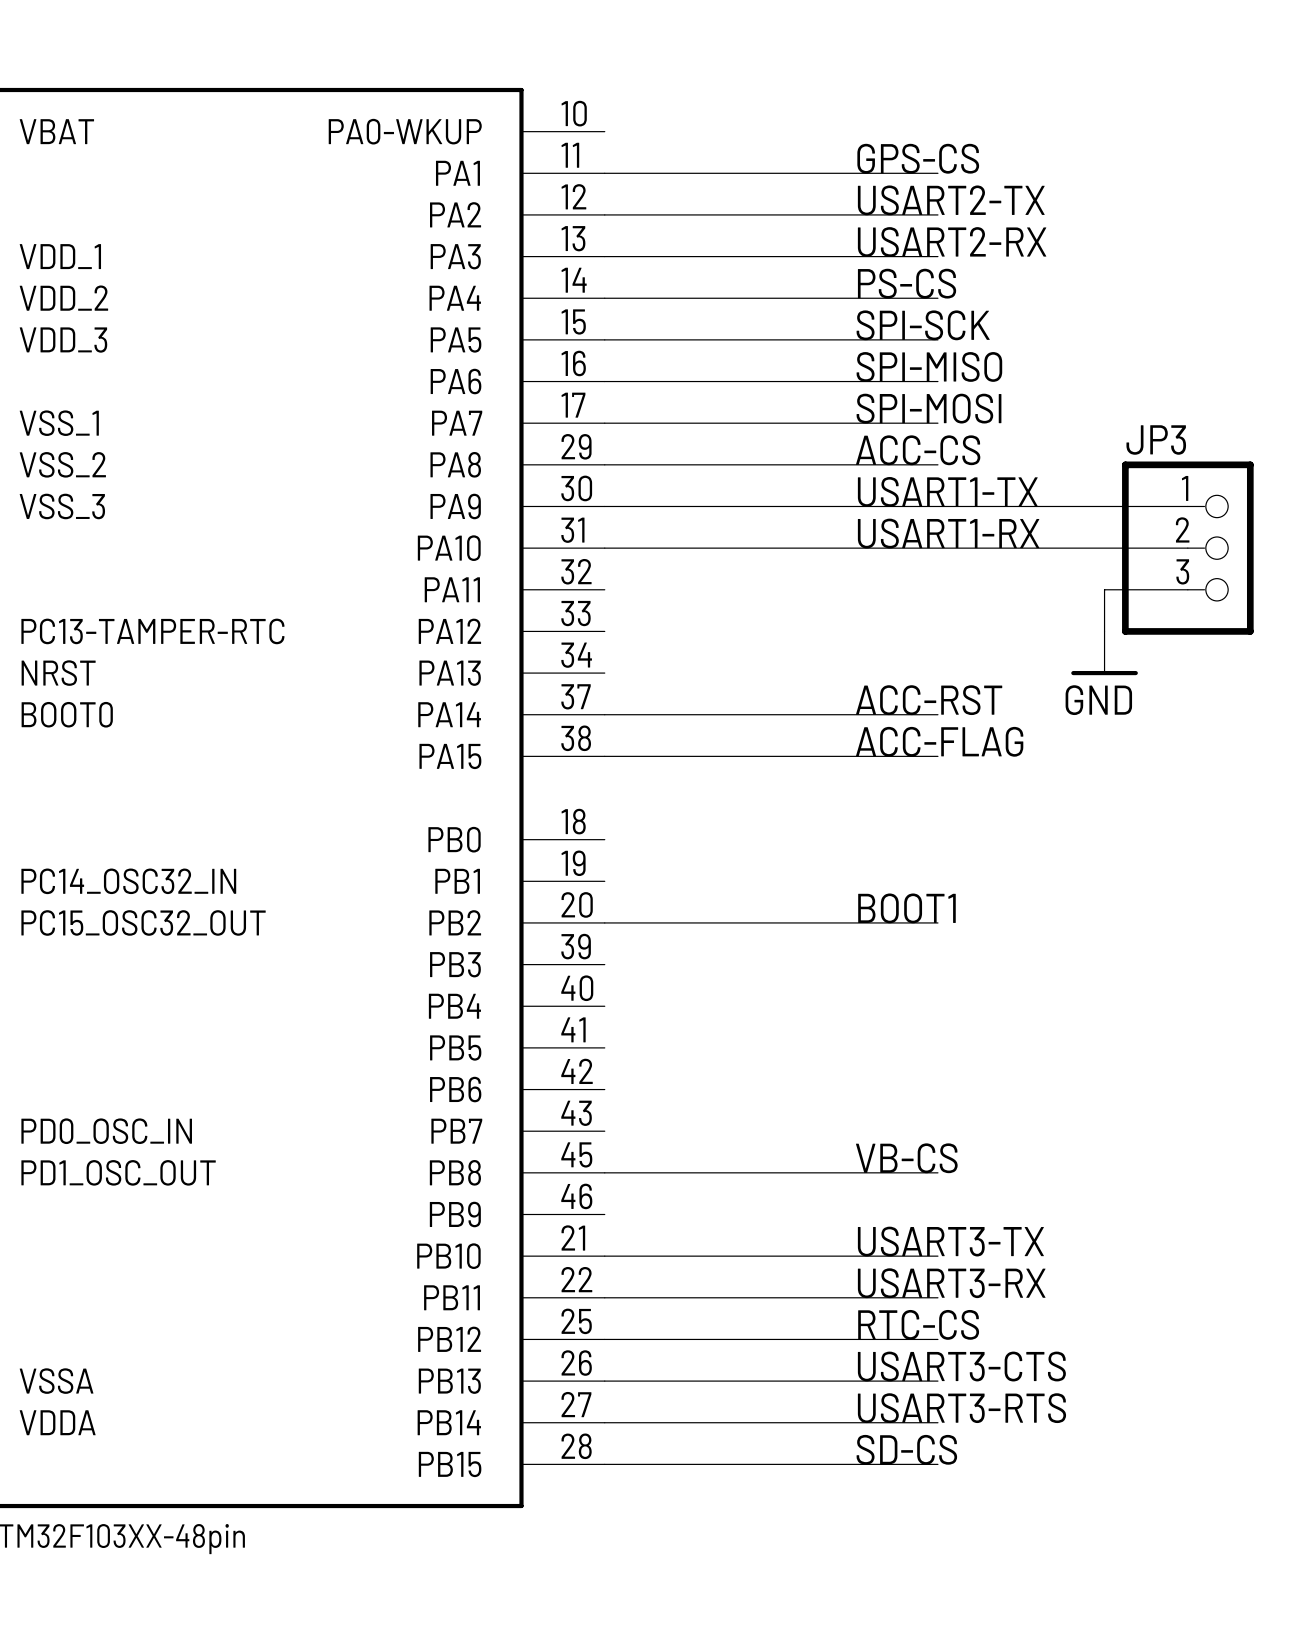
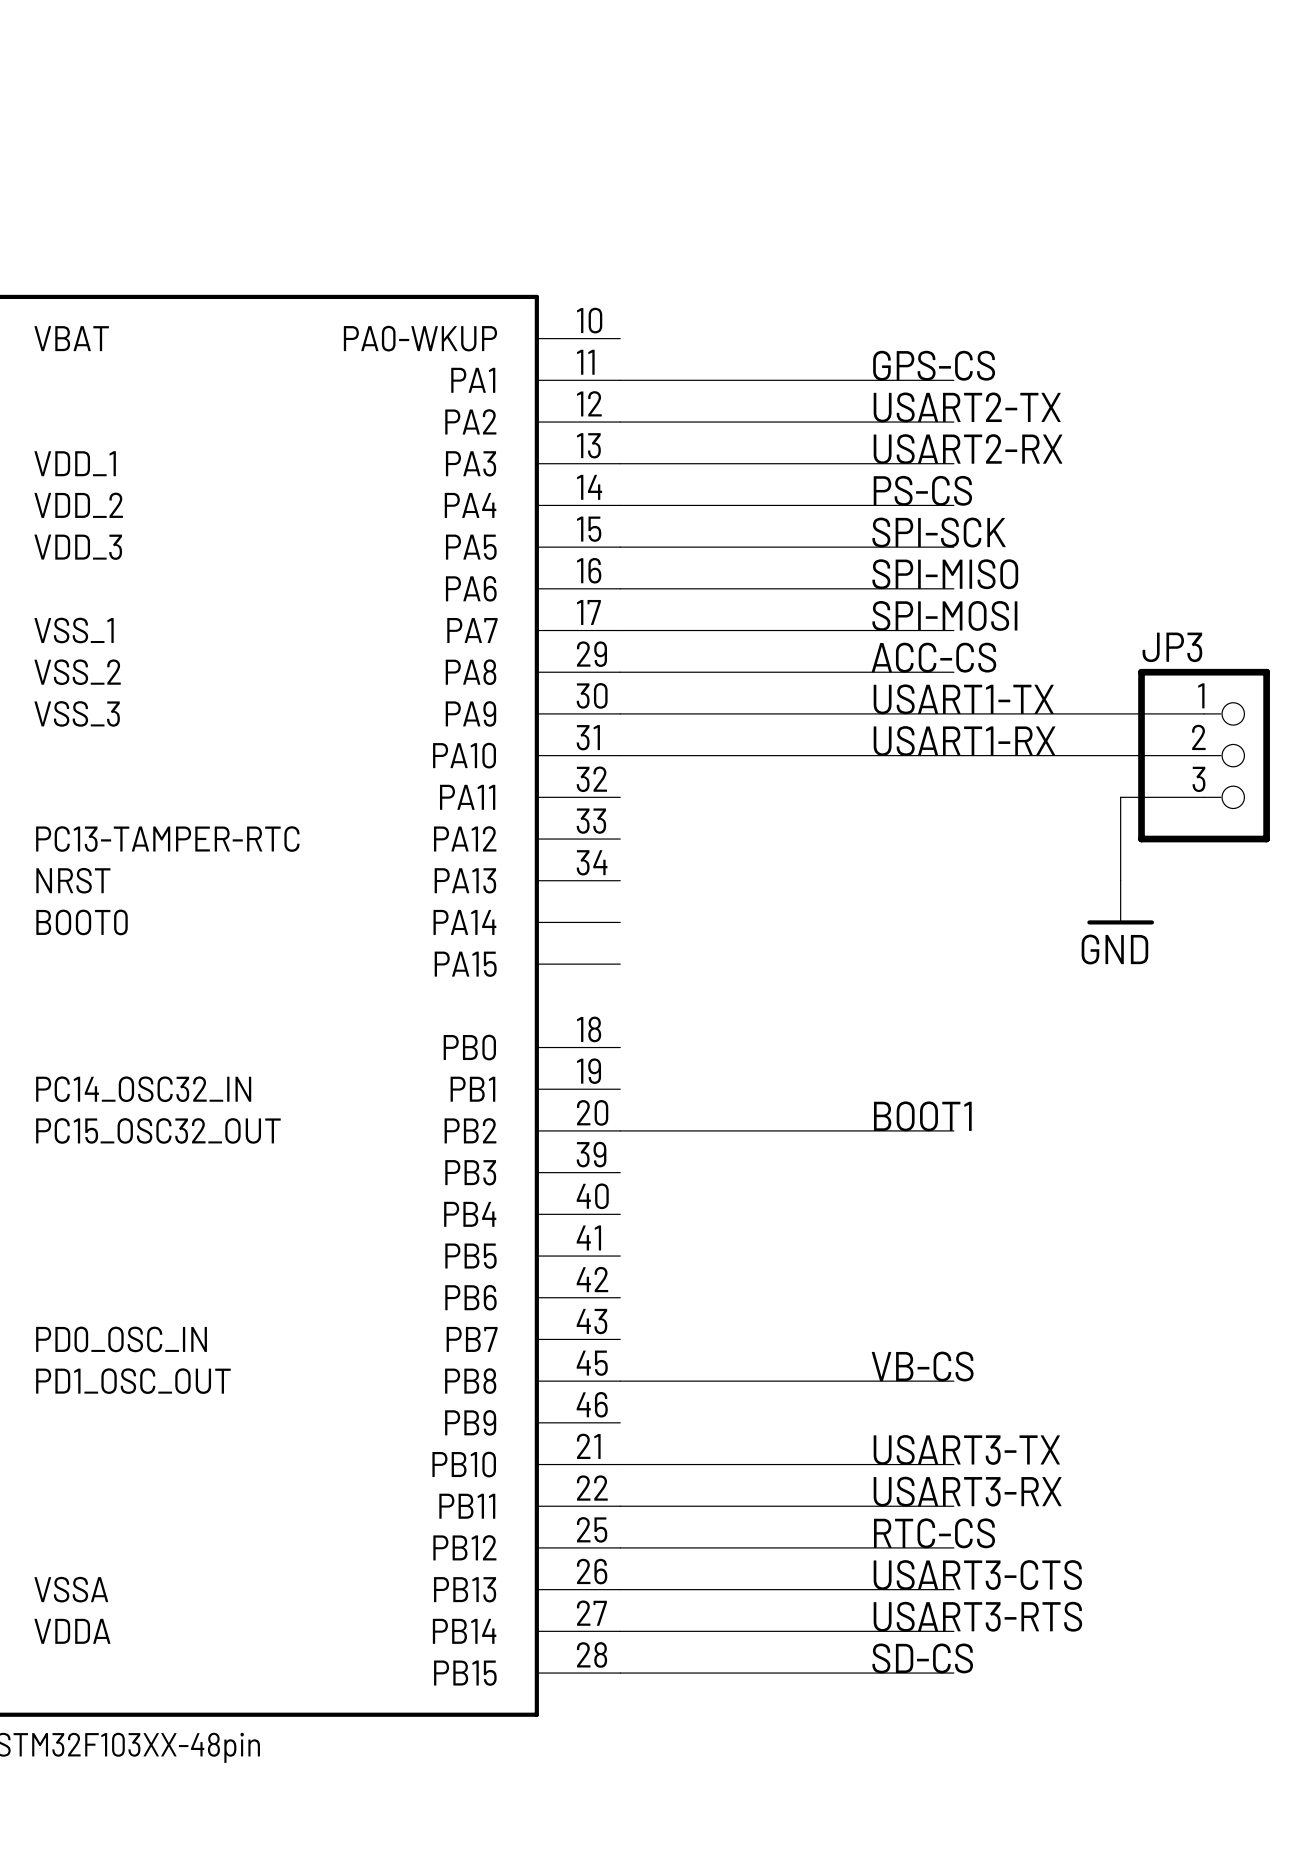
power symbol position: GND (1104, 653) -> GND (1120, 902)
part pin number: 37 (576, 696) -> none
label: ACC-RST (929, 700) -> none
wire: (604, 714) (937, 714) -> none
part pin number: 38 (576, 738) -> none
label: ACC-FLAG (939, 741) -> none
wire: (604, 756) (937, 756) -> none

